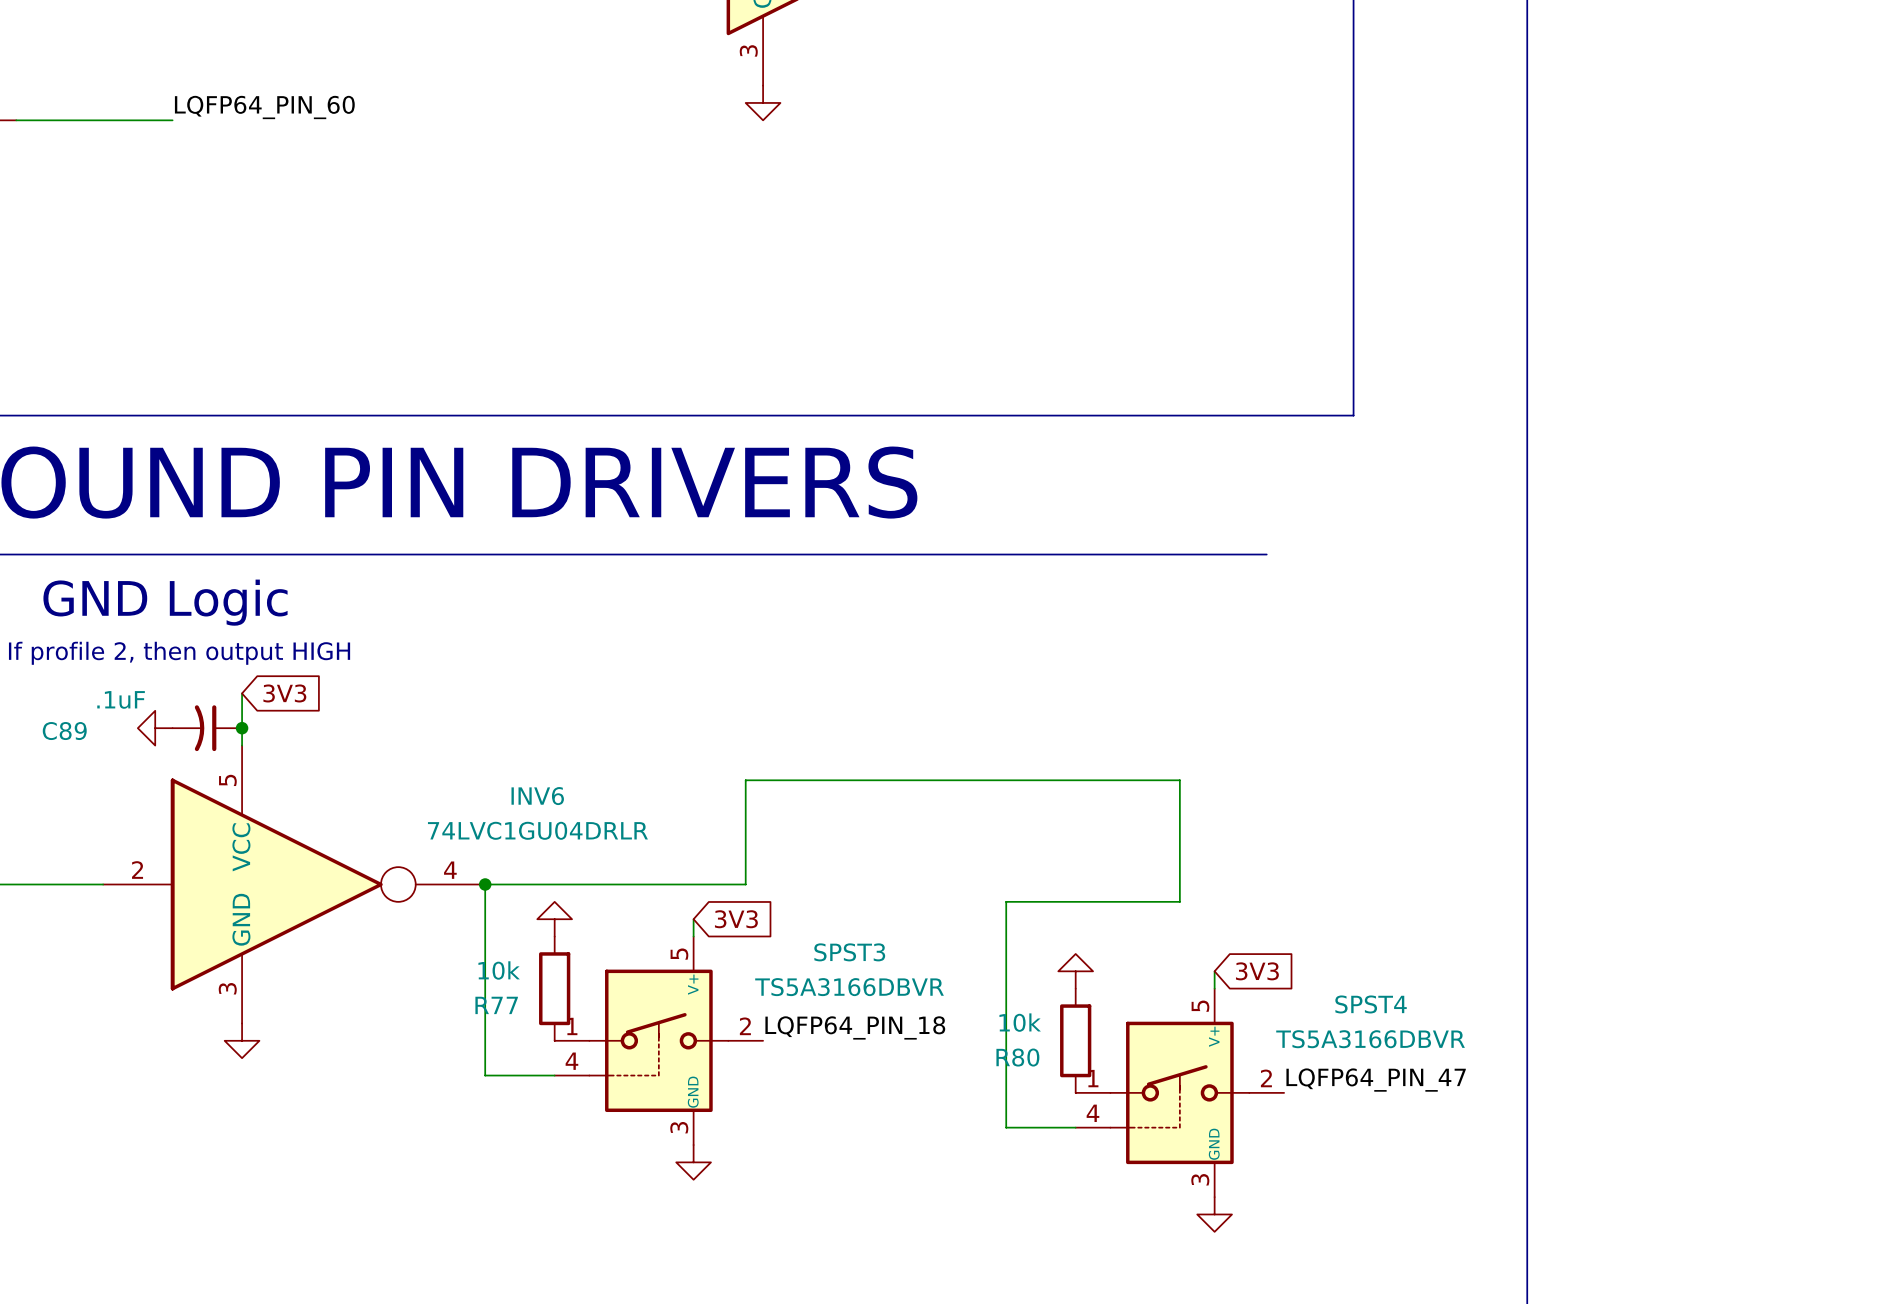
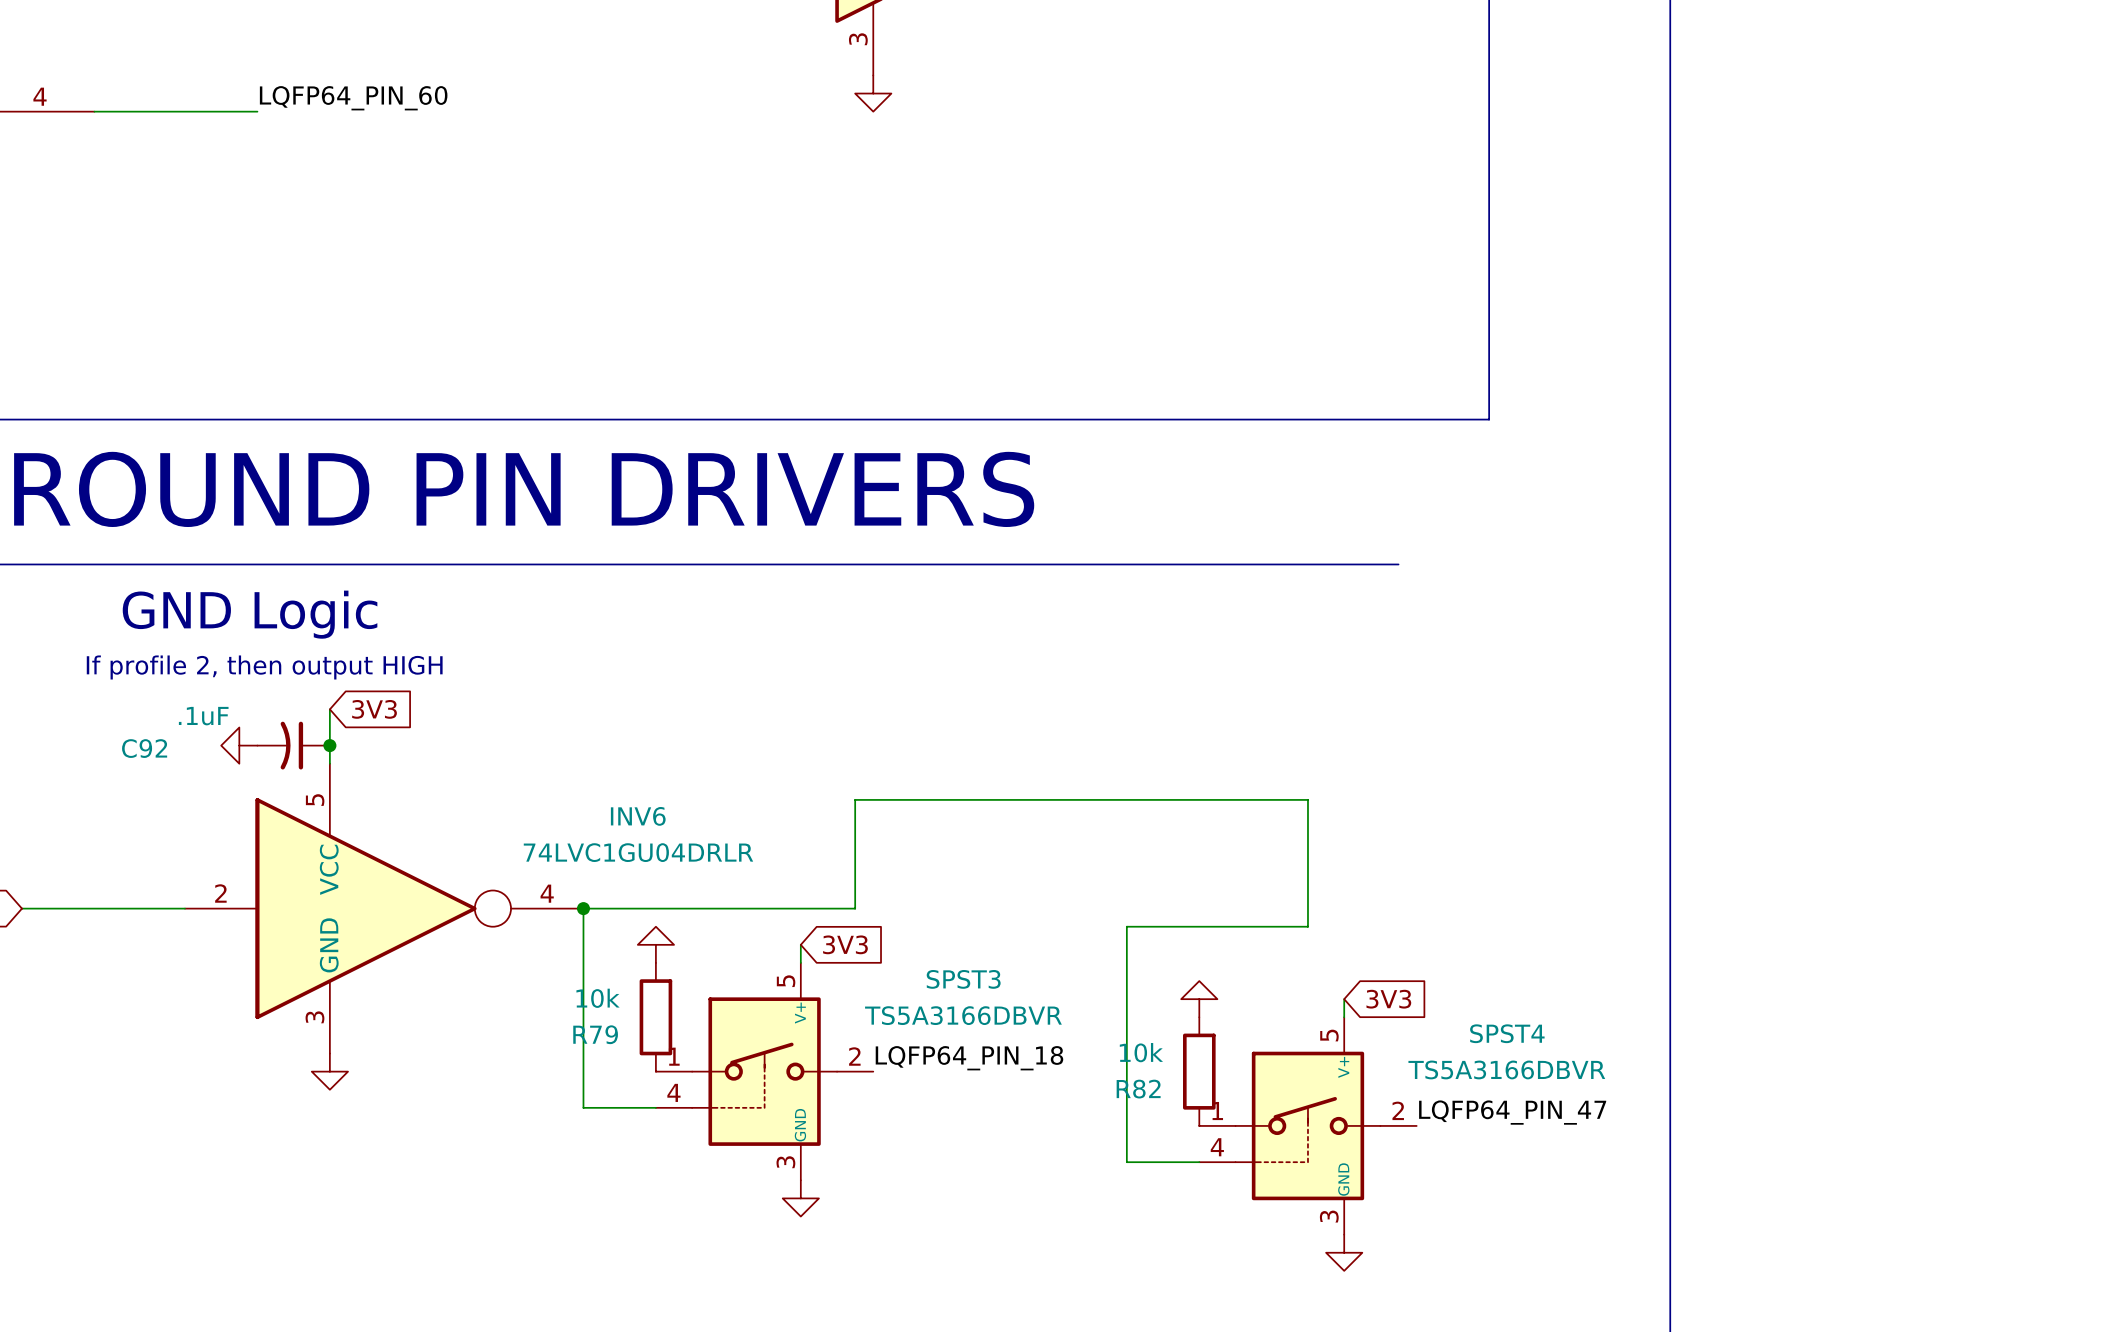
C89 name: C89 (64, 731) -> C92 (144, 748)
R77 name: R77 (496, 1005) -> R79 (595, 1034)
R80 name: R80 (1017, 1057) -> R82 (1138, 1089)

